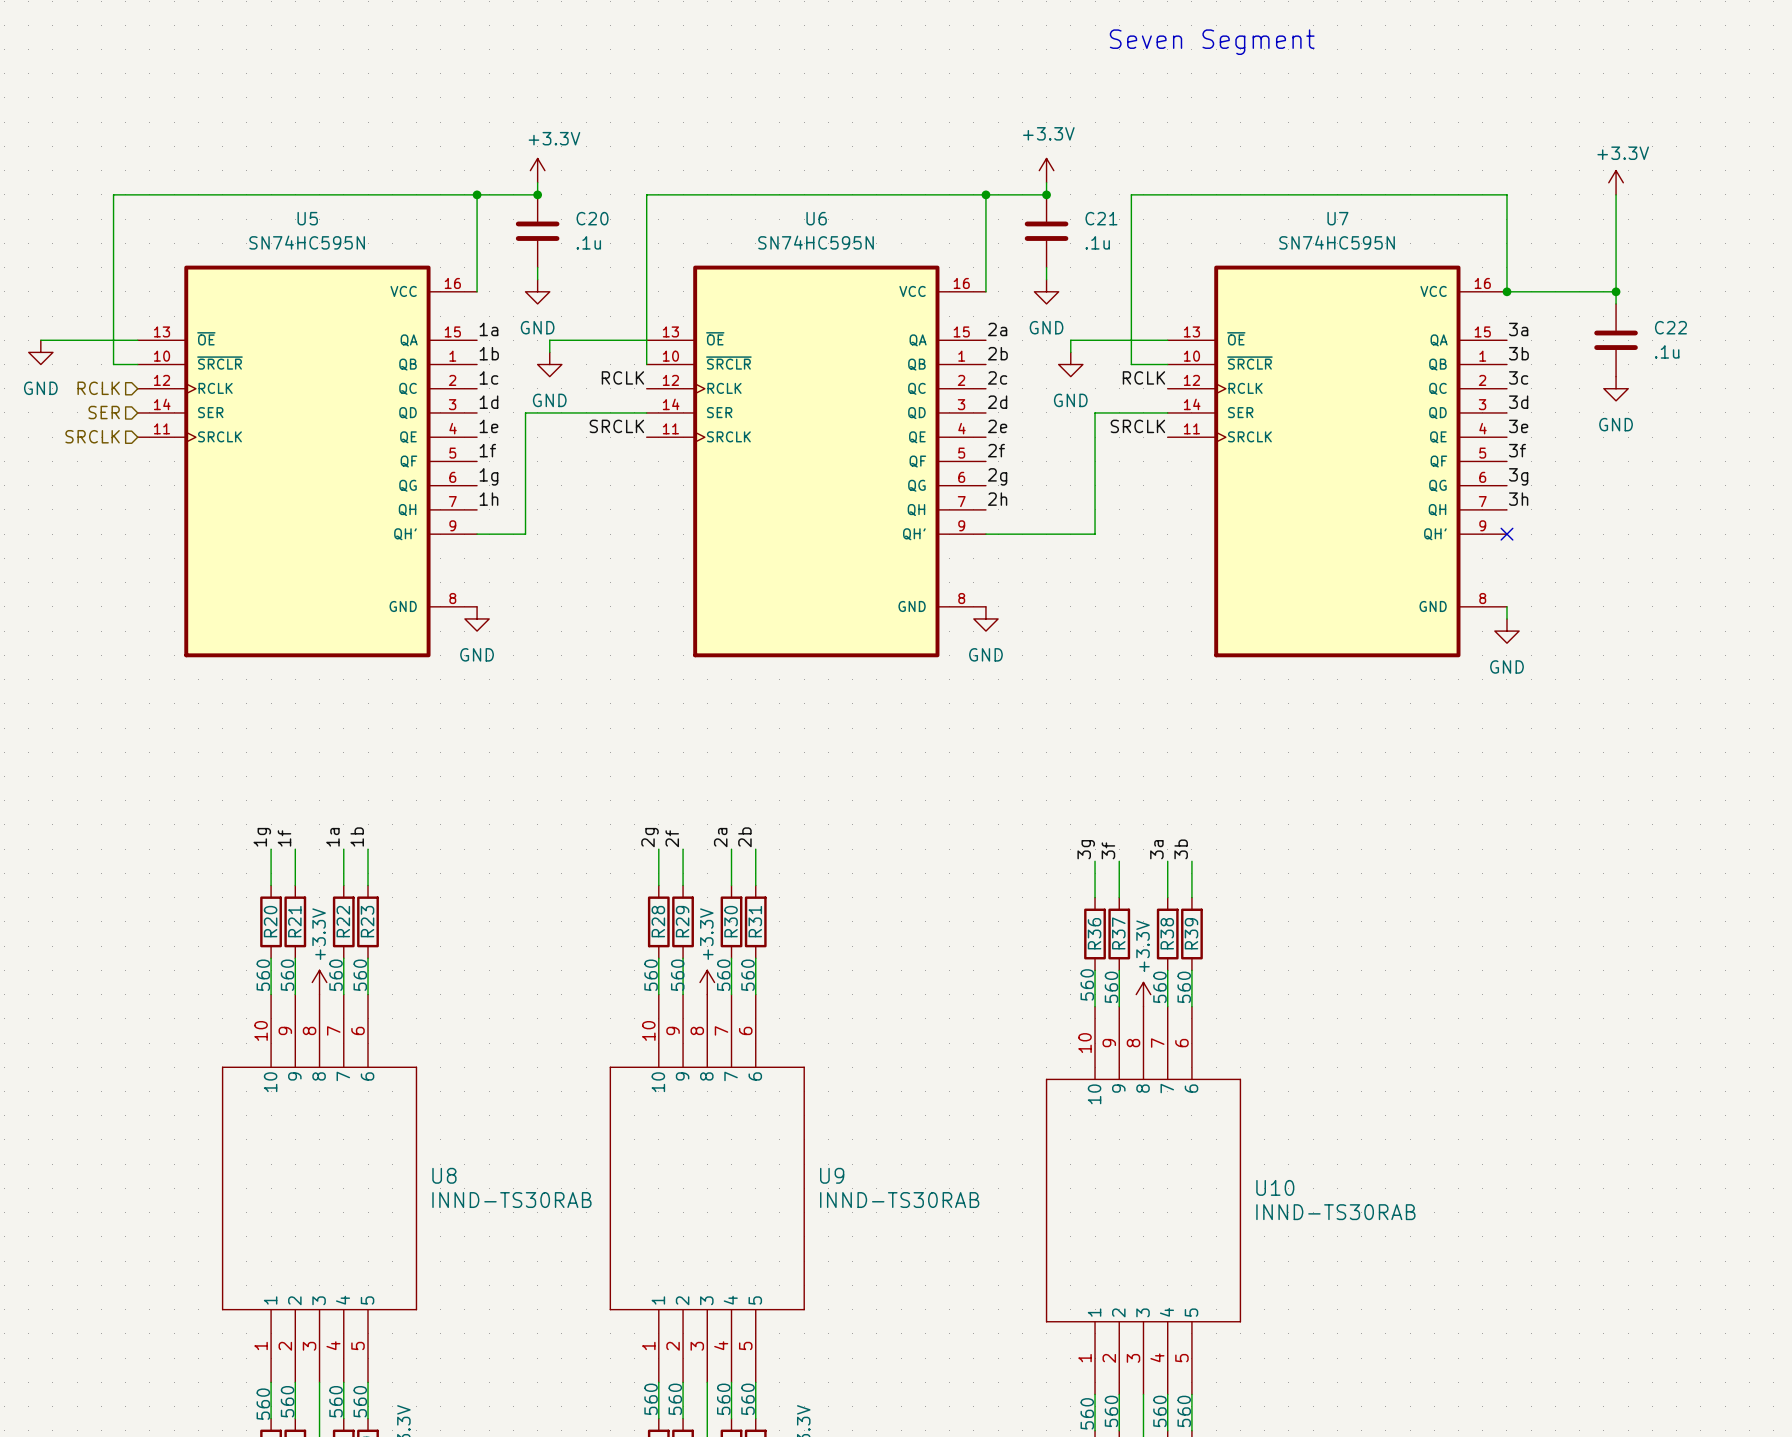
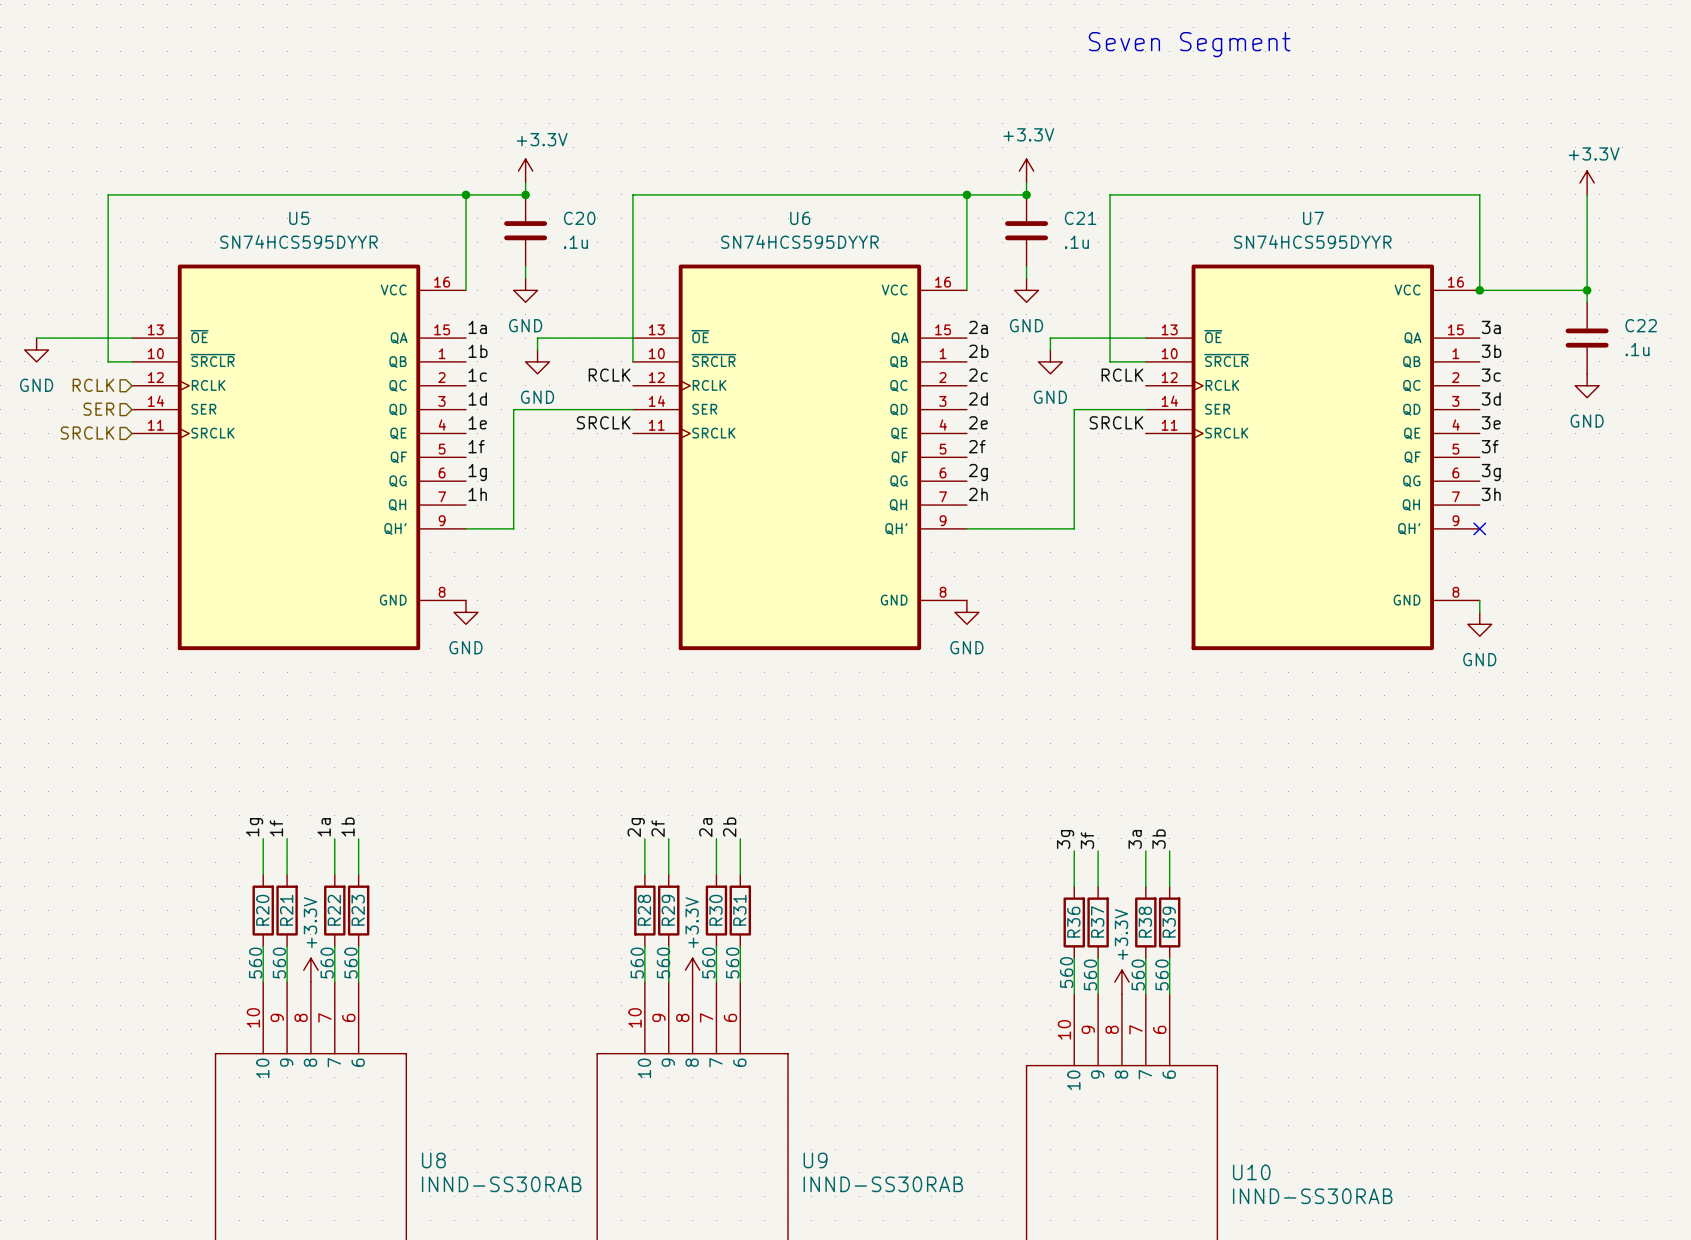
U5 value: SN74HC595N (307, 242) -> SN74HCS595DYYR (299, 241)
U6 value: SN74HC595N (816, 242) -> SN74HCS595DYYR (799, 241)
U7 value: SN74HC595N (1337, 242) -> SN74HCS595DYYR (1312, 241)
U8 value: INND-TS30RAB (511, 1200) -> INND-SS30RAB (501, 1184)
U9 value: INND-TS30RAB (899, 1200) -> INND-SS30RAB (883, 1184)
U10 value: INND-TS30RAB (1335, 1212) -> INND-SS30RAB (1312, 1196)

